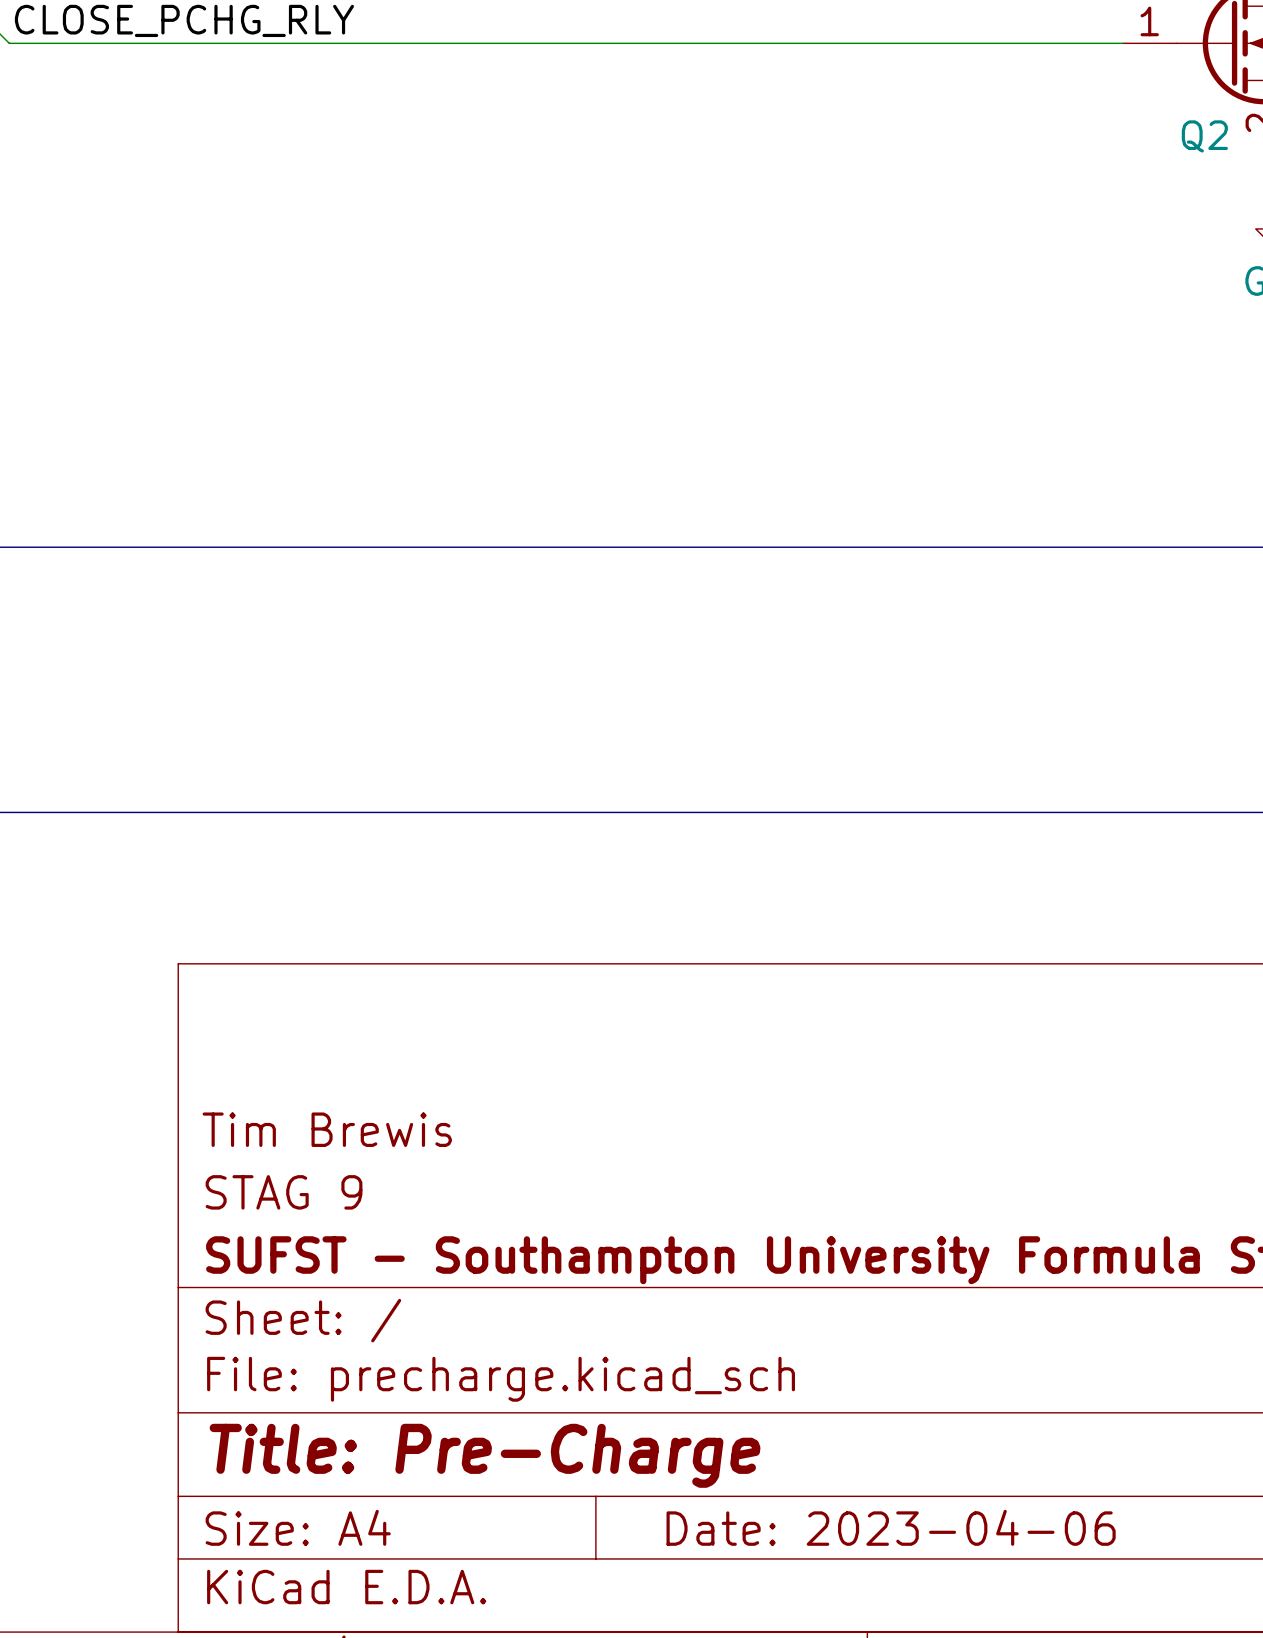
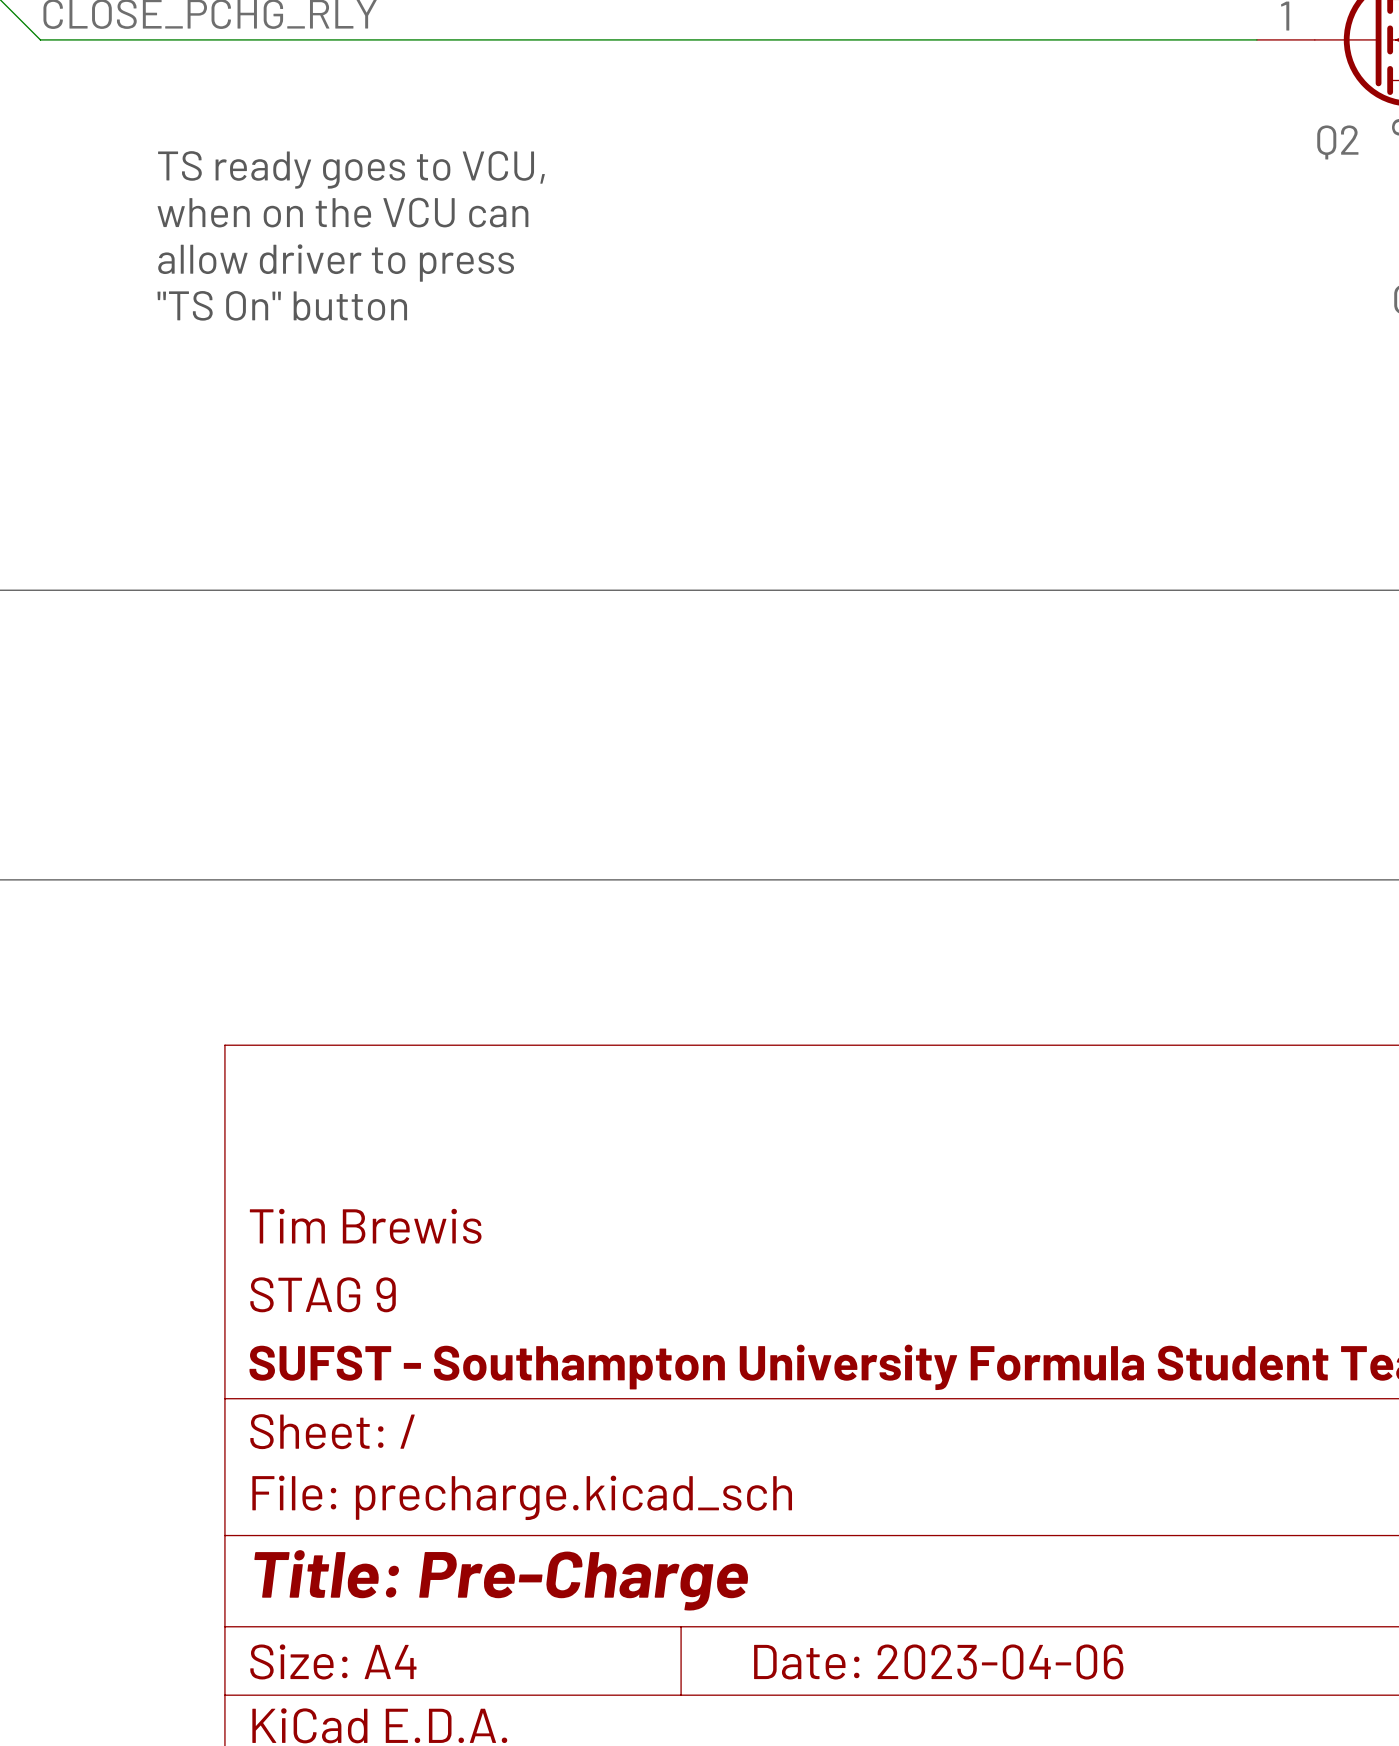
text: none -> TS ready goes to VCU, (351, 169)
text: none -> when on the VCU can (342, 212)
text: none -> allow driver to press (336, 263)
text: none -> "TS On" button (282, 305)

